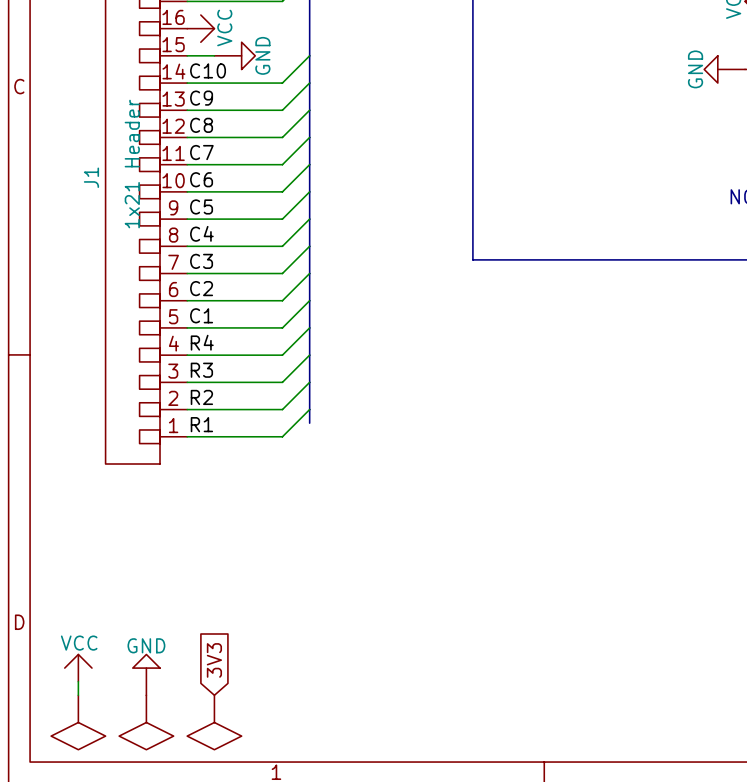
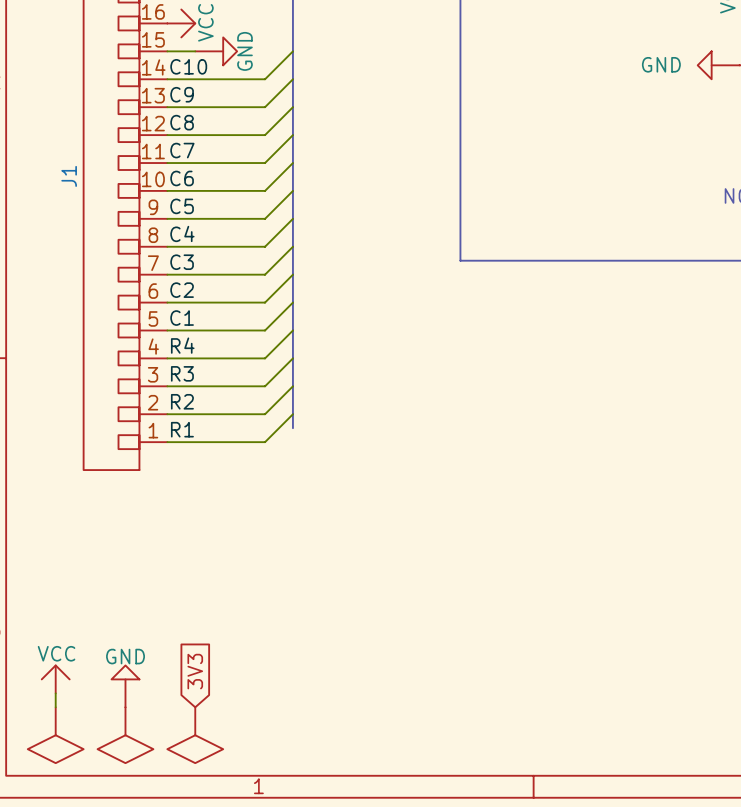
power symbol text rotation: 0° (695, 69) -> 90° clockwise (661, 64)
J1 value: 1x21 Header (132, 164) -> none

